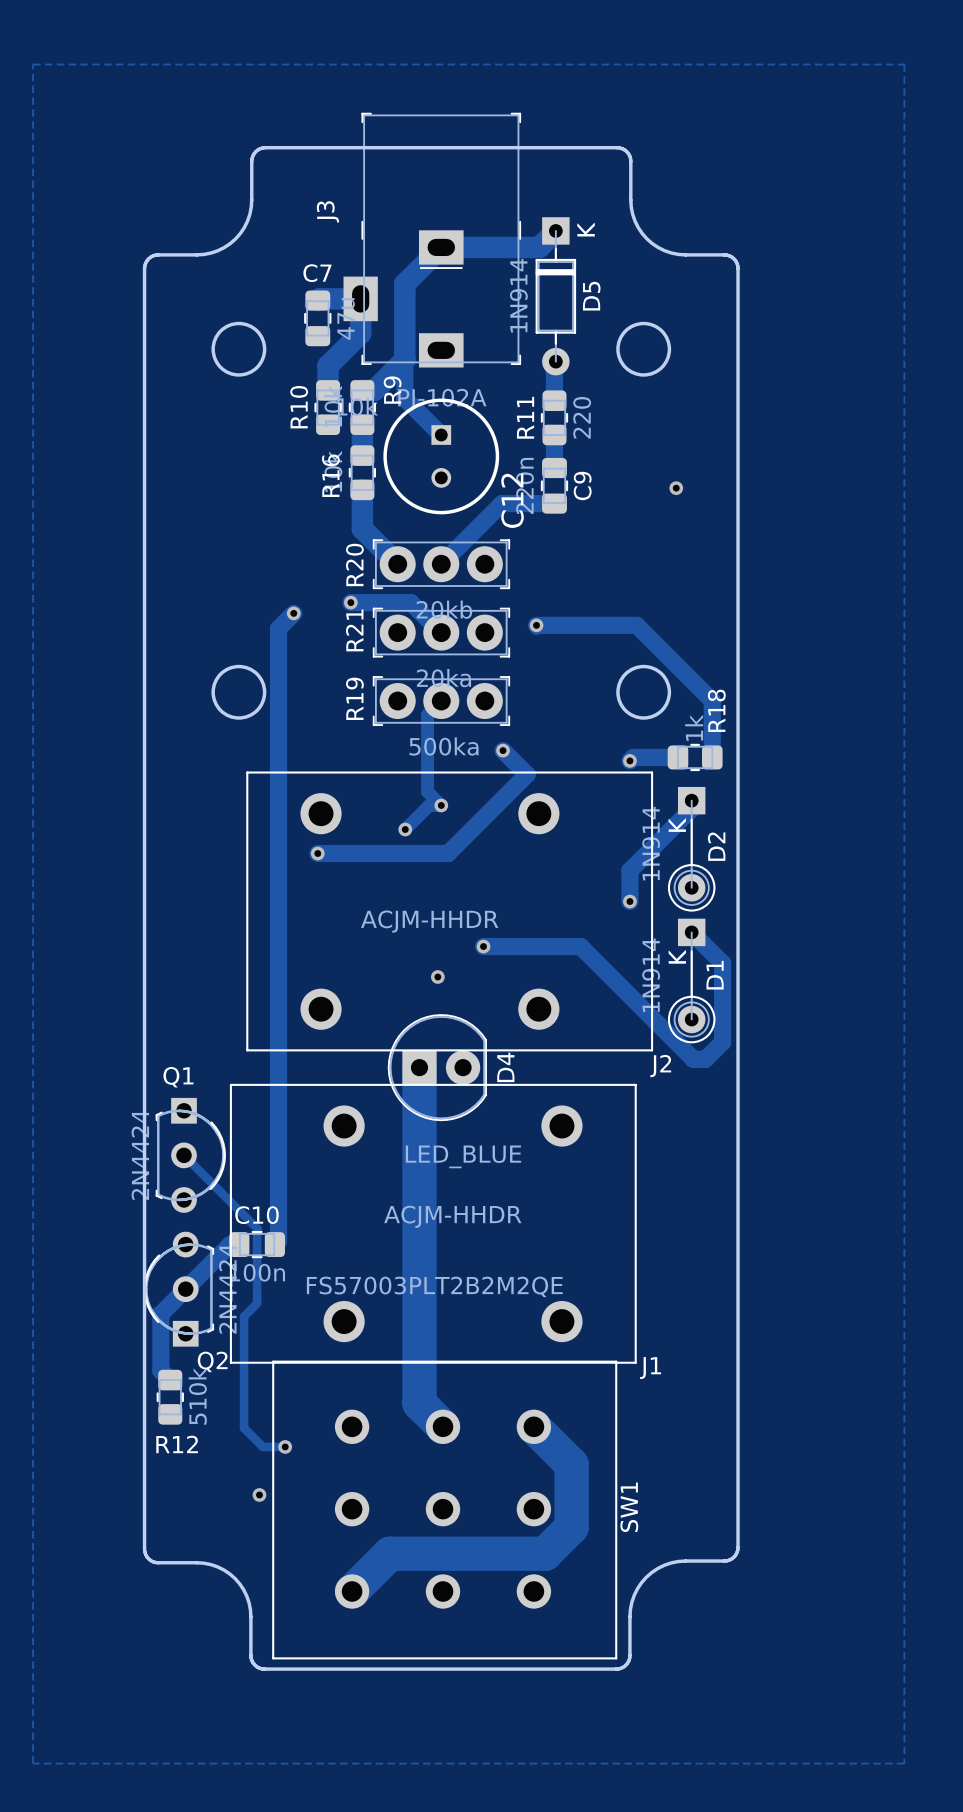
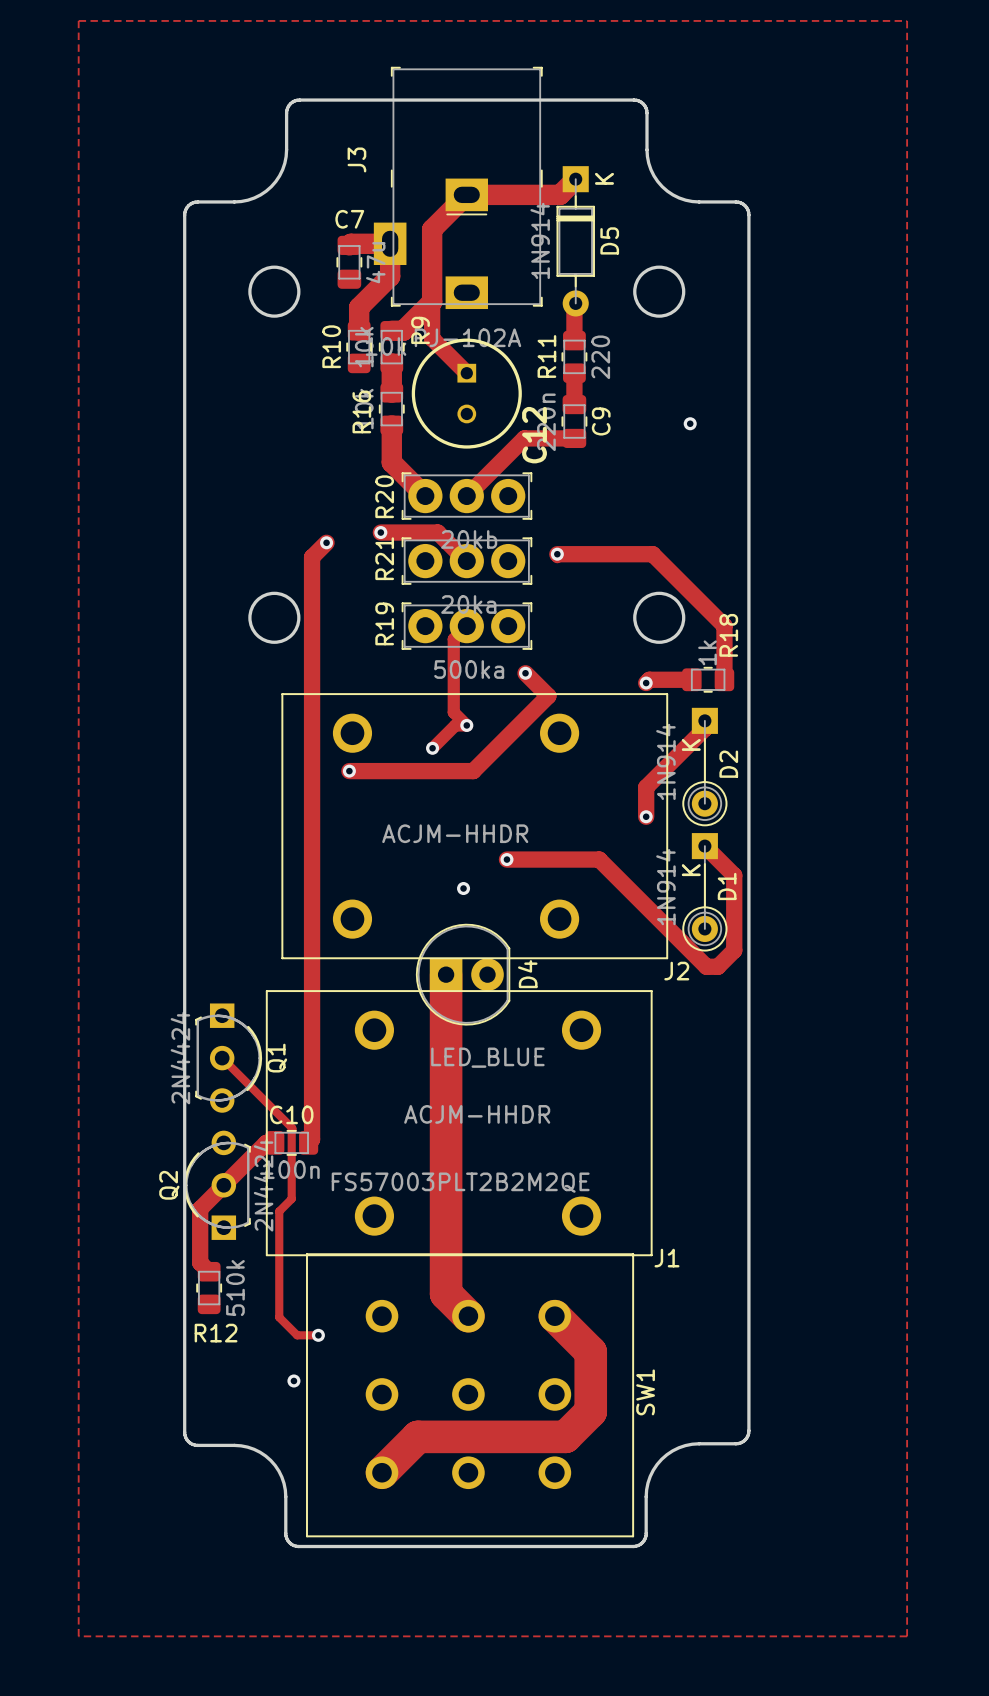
Q1 name rotation: 0° (178, 1077) -> 90° counterclockwise (276, 1058)
Q1 name position: Q1 (178, 1077) -> Q1 (276, 1058)
Q2 name rotation: 0° (212, 1361) -> 90° counterclockwise (169, 1185)
Q2 name position: Q2 (212, 1361) -> Q2 (169, 1185)

